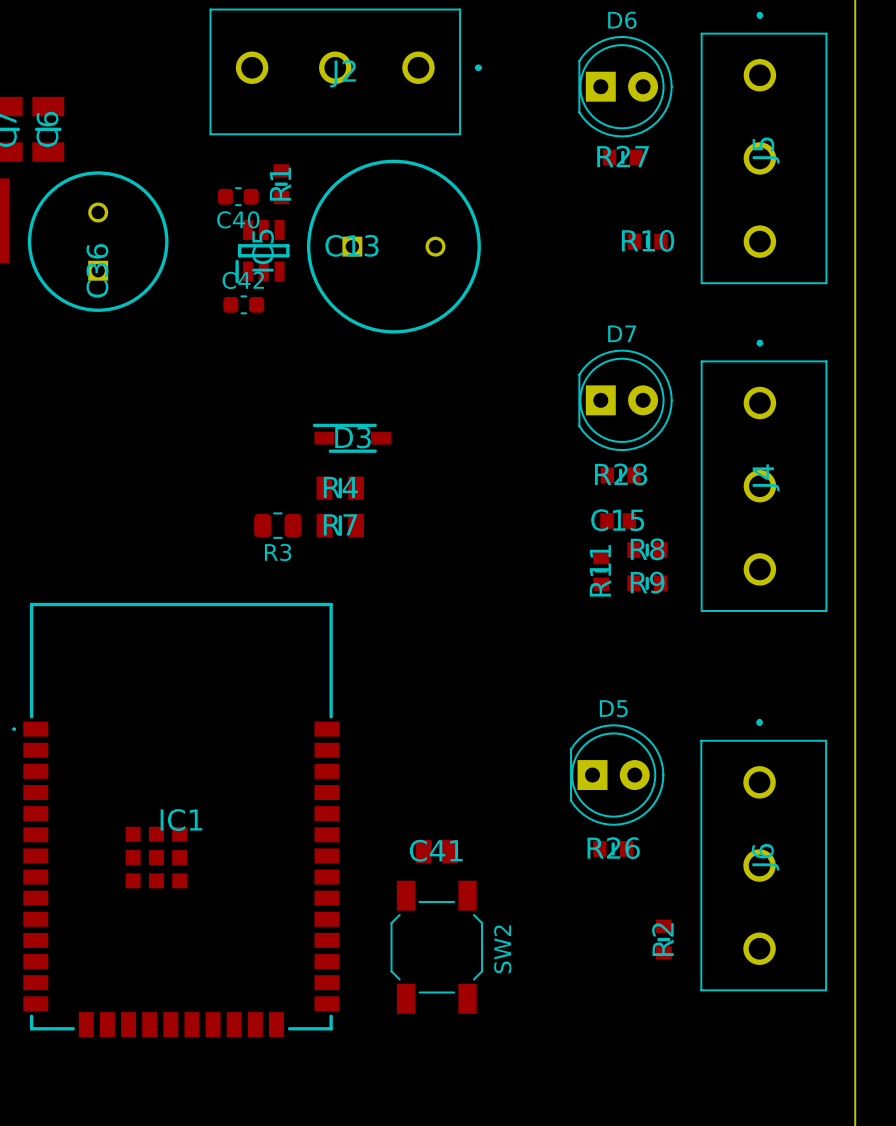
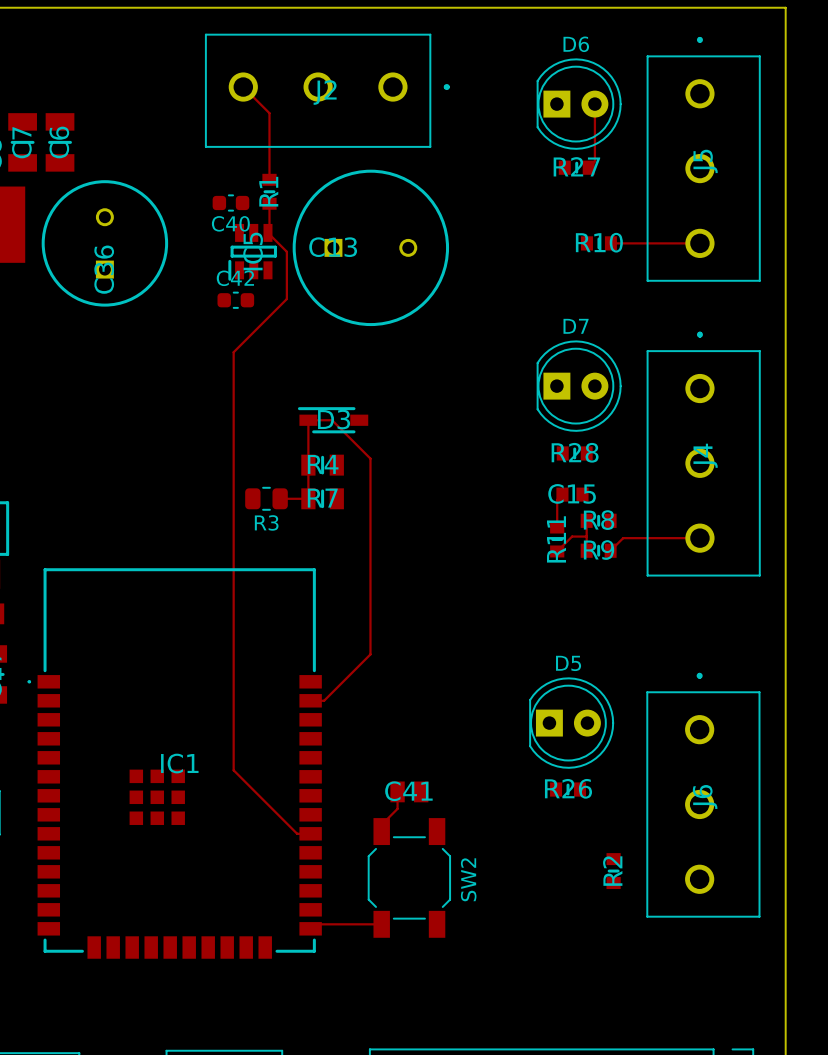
track: none -> (243, 87) (269, 113) (269, 179)
track: none -> (594, 104) (594, 161) (588, 167)
track: none -> (269, 203) (267, 232) (286, 251) (286, 299) (233, 352) (233, 770) (297, 833) (310, 833)
track: none -> (610, 243) (699, 243)
track: none -> (562, 494) (557, 499) (557, 527)
track: none -> (280, 498) (308, 498) (308, 420) (332, 420) (370, 458) (370, 654) (324, 700) (310, 700)
track: none -> (586, 520) (585, 551)
track: none -> (586, 536) (572, 536) (557, 551)
track: none -> (699, 538) (623, 538) (610, 550)
track: none -> (397, 791) (397, 808) (381, 824) (381, 831)
track: none -> (381, 924) (315, 924) (310, 928)

